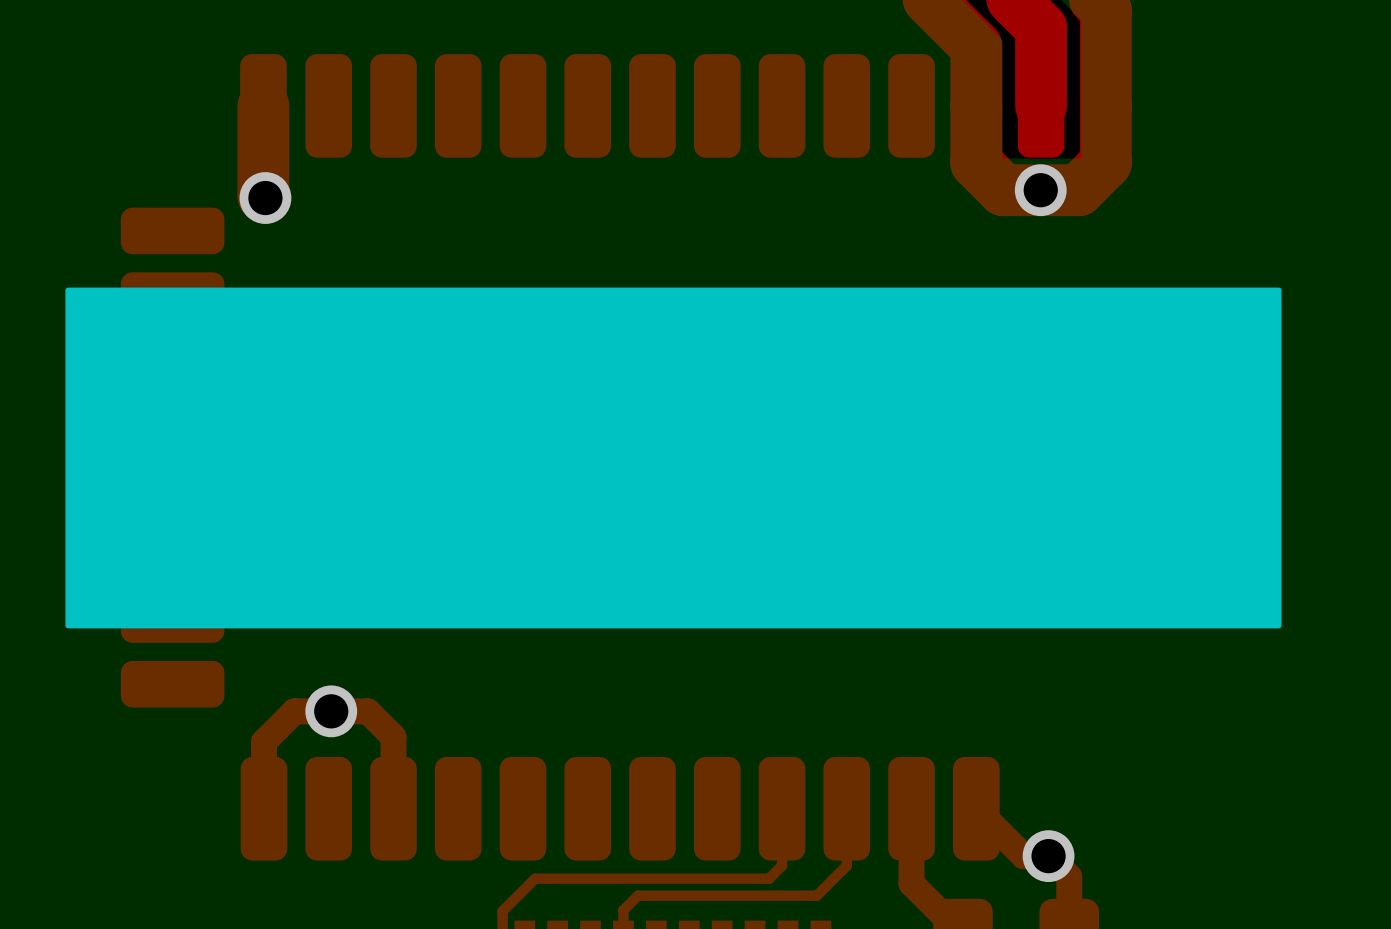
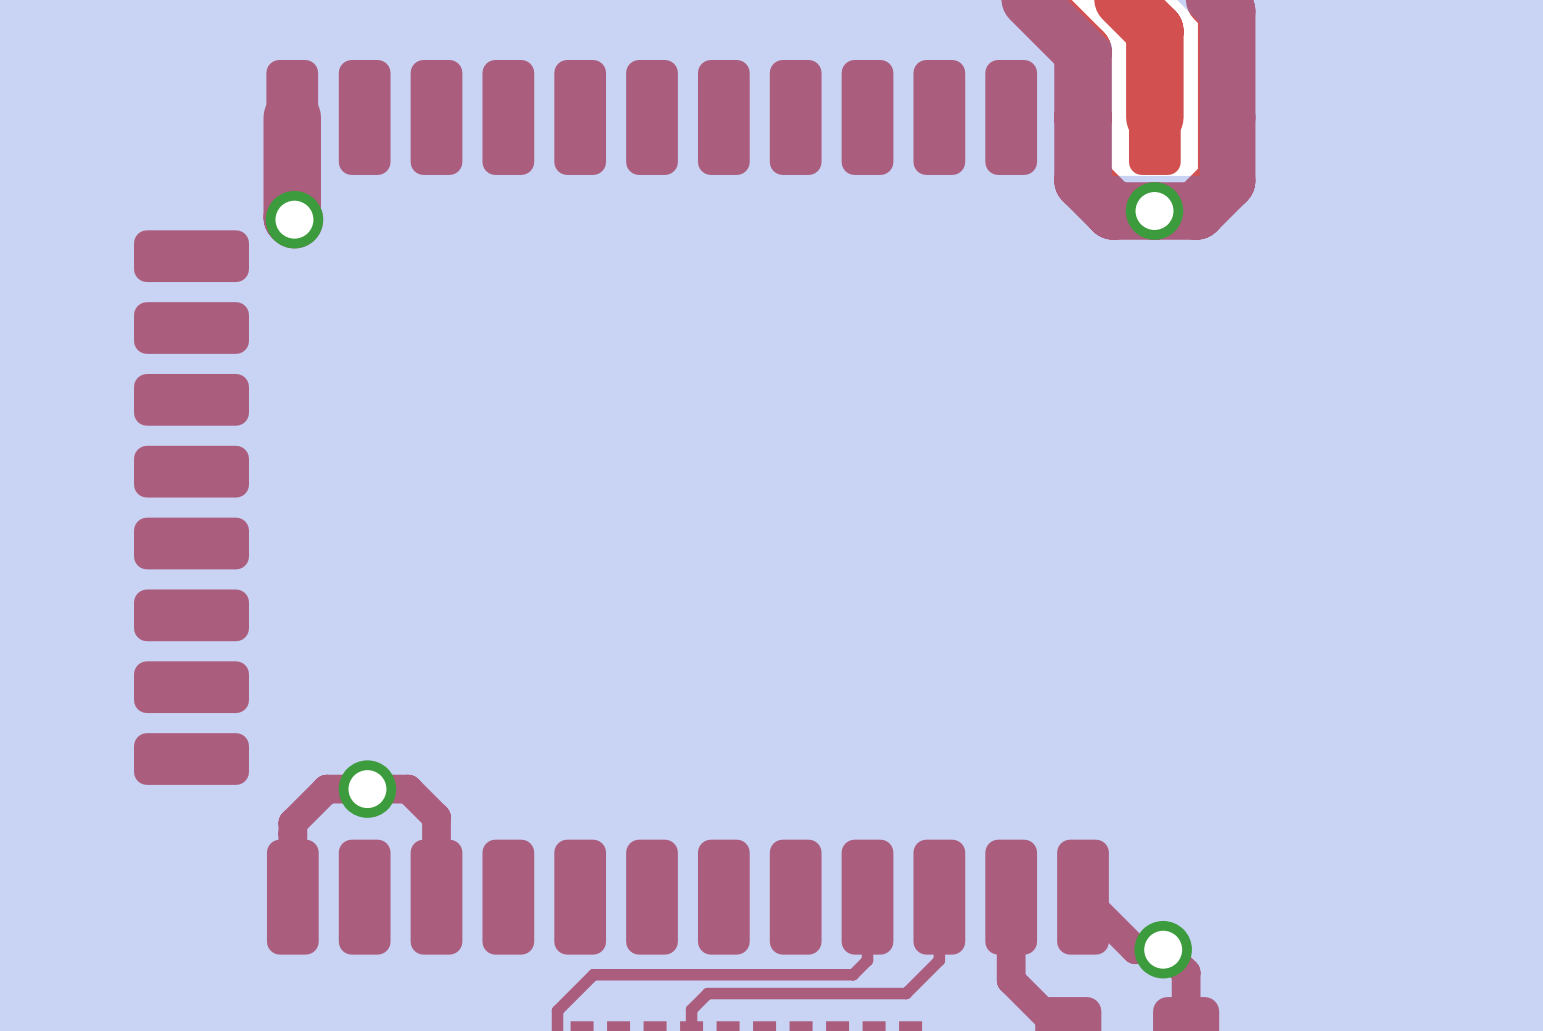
drawing: [65, 287, 1282, 629] -> none

